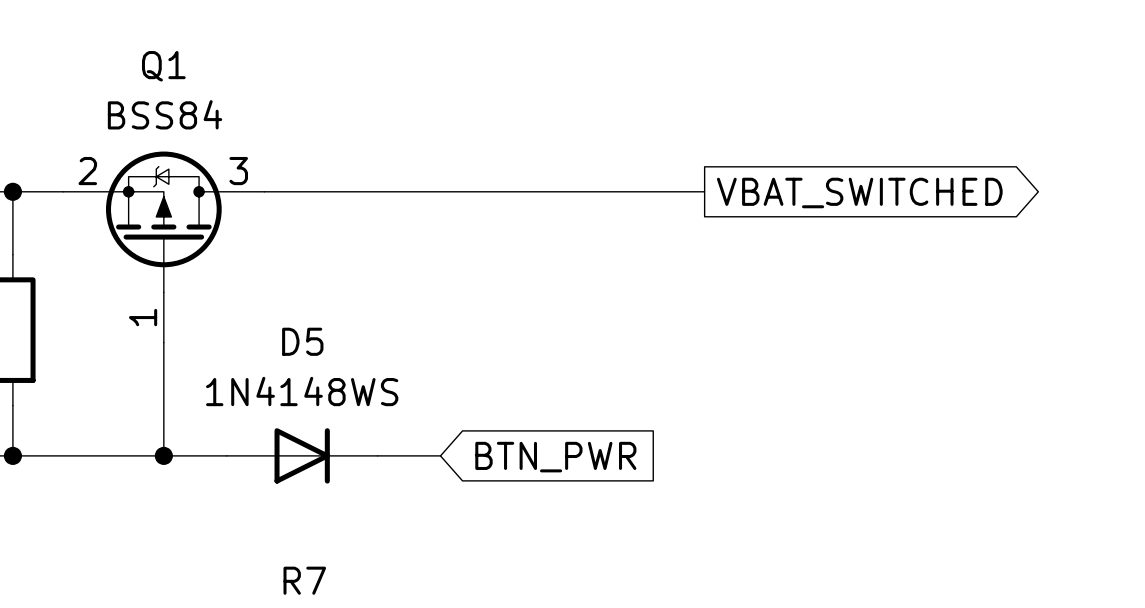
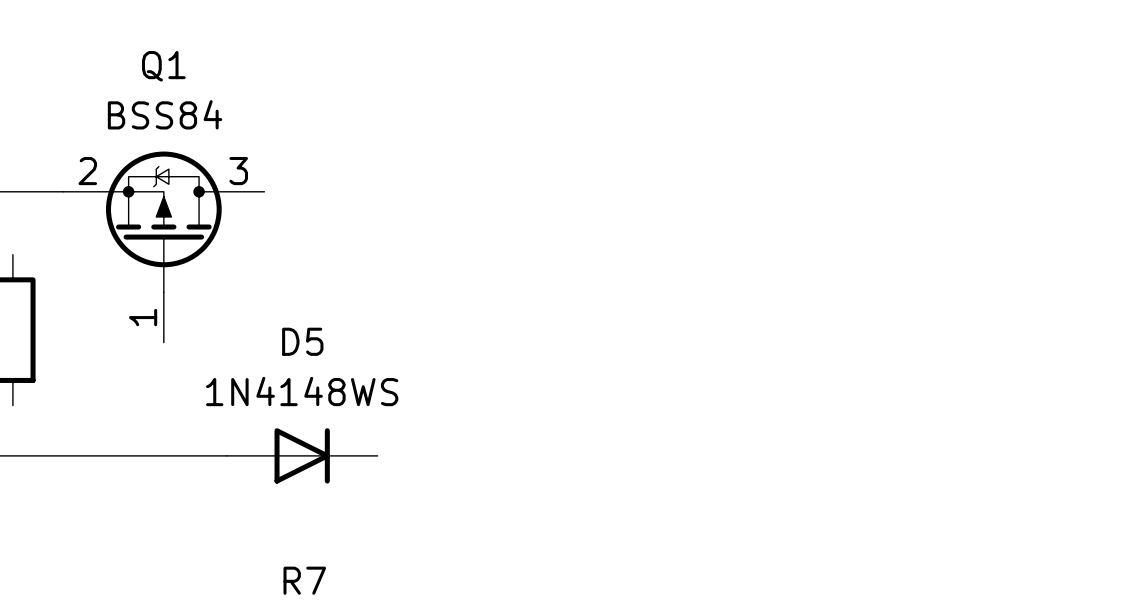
wire: (12, 191) (12, 254) -> none
junction: (12, 191) -> none
wire: (264, 191) (704, 191) -> none
global label: VBAT_SWITCHED (859, 192) -> none
wire: (163, 342) (163, 455) -> none
wire: (12, 405) (12, 455) -> none
junction: (12, 455) -> none
junction: (163, 455) -> none
wire: (377, 455) (440, 455) -> none
global label: BTN_PWR (555, 457) -> none

